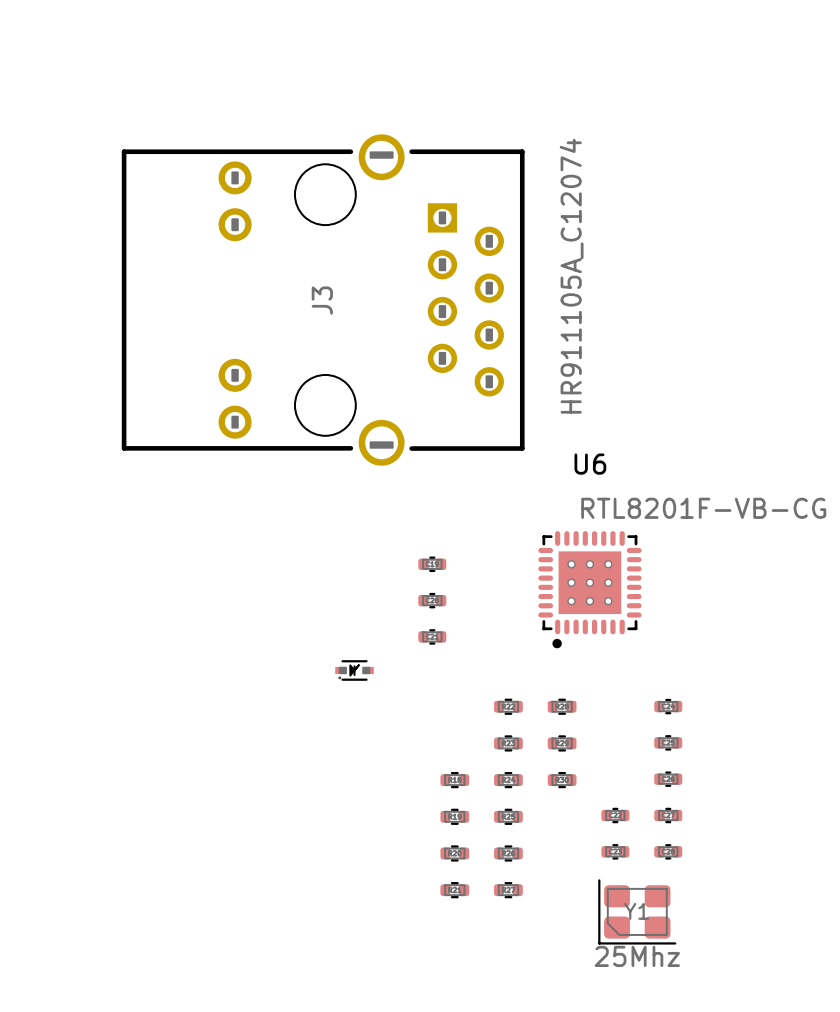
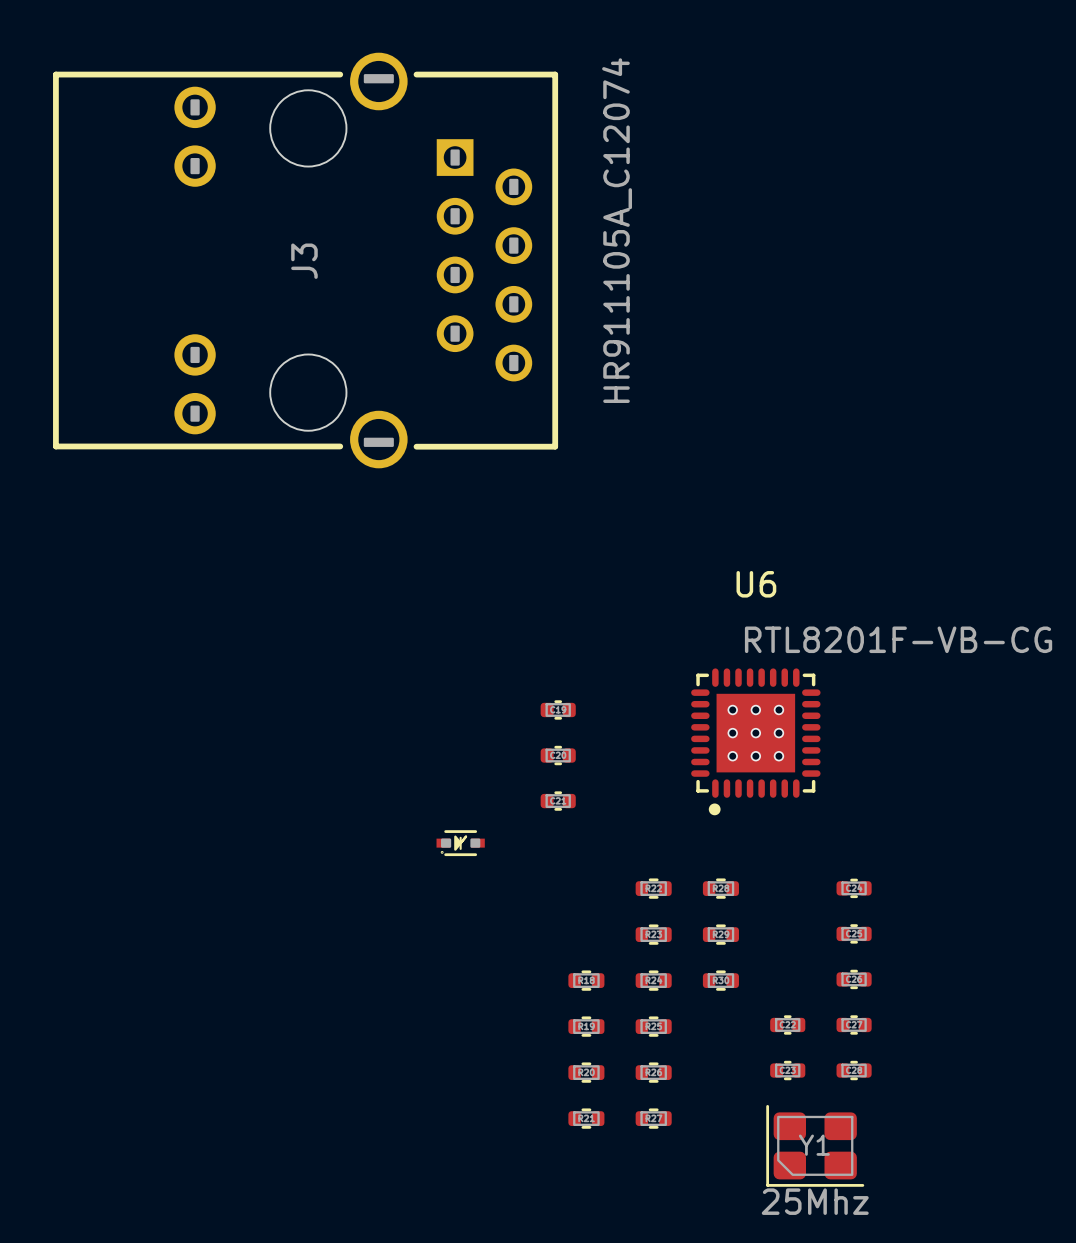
J3 position: (323, 300) -> (305, 260)

